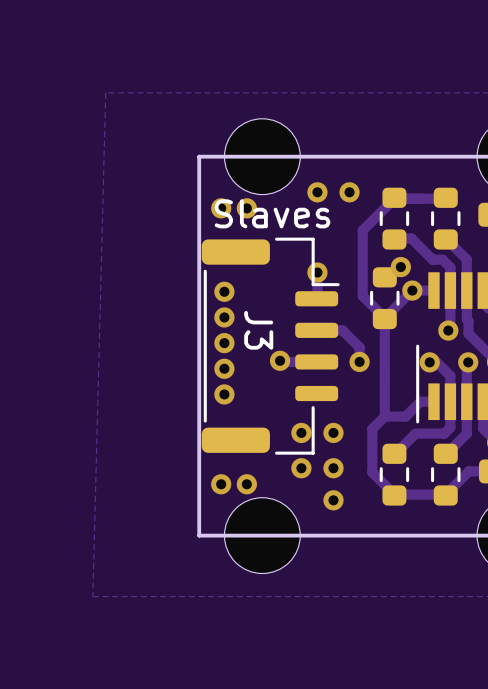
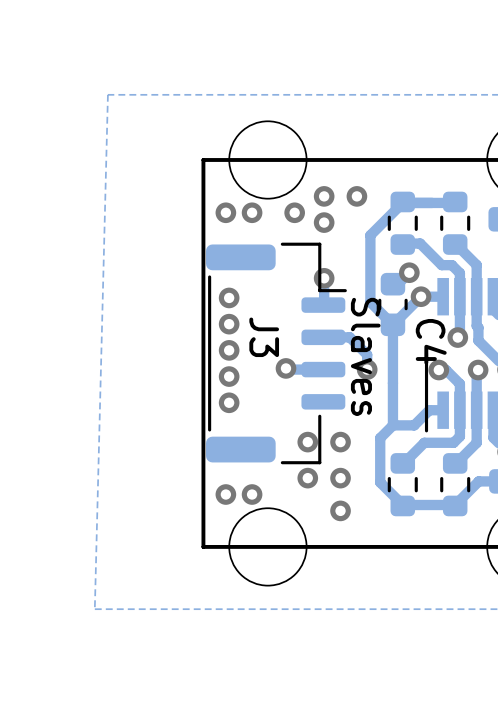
via: none -> (294, 212)
text rotation: 0° (272, 213) -> 90° clockwise (365, 356)
text position: Slaves (272, 213) -> Slaves (365, 356)
via: none -> (324, 222)
part: (384, 298) -> none
C4: none -> (392, 304)

